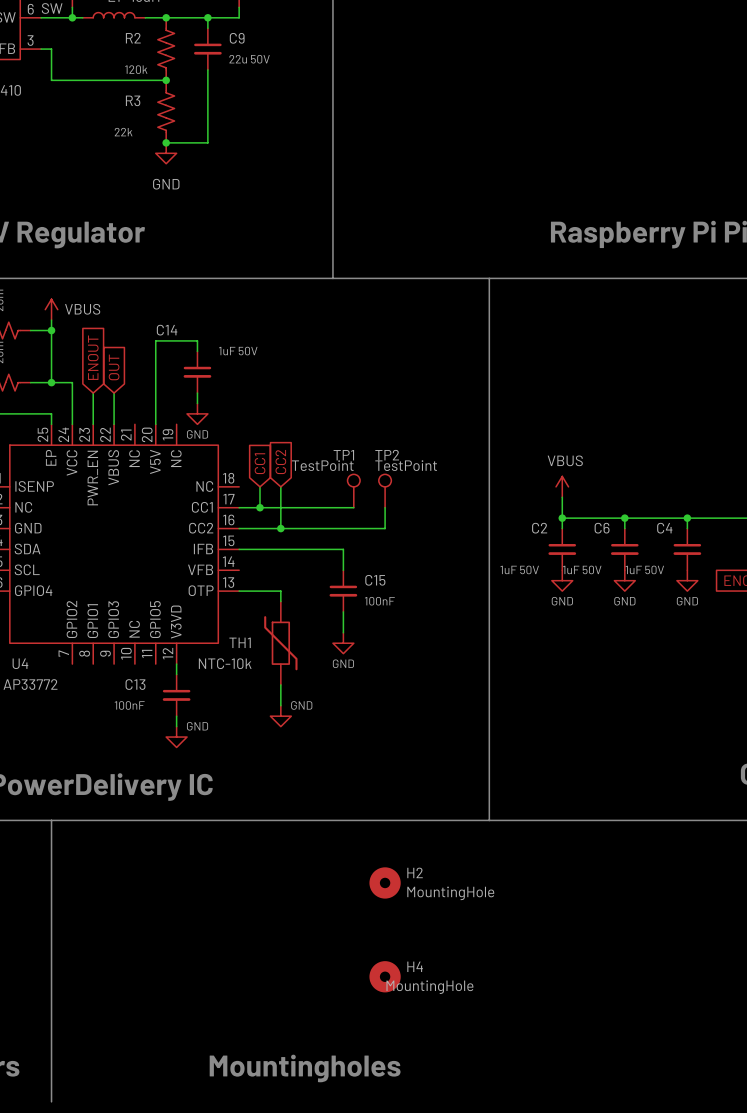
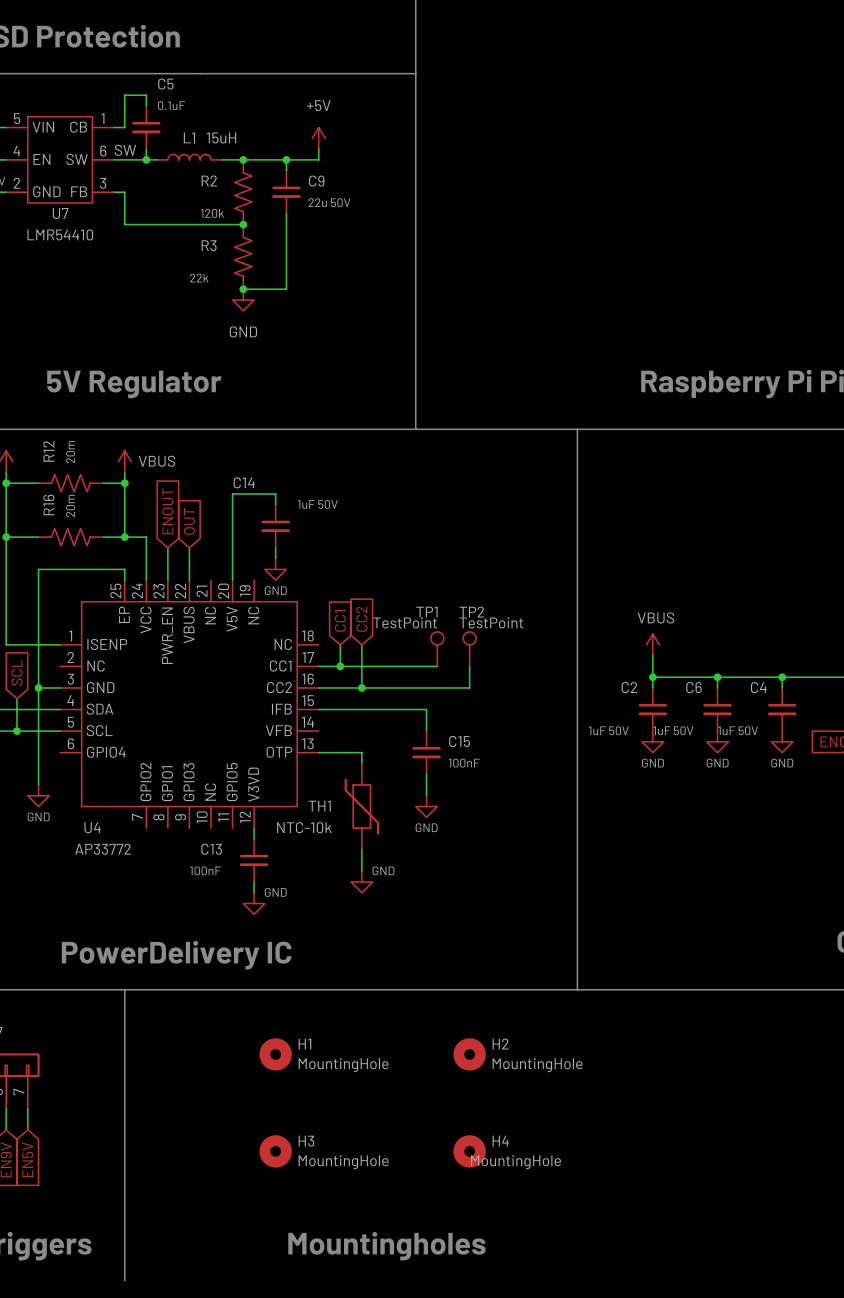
H1: none -> MountingHole (275, 1054)
H3: none -> MountingHole (275, 1151)

